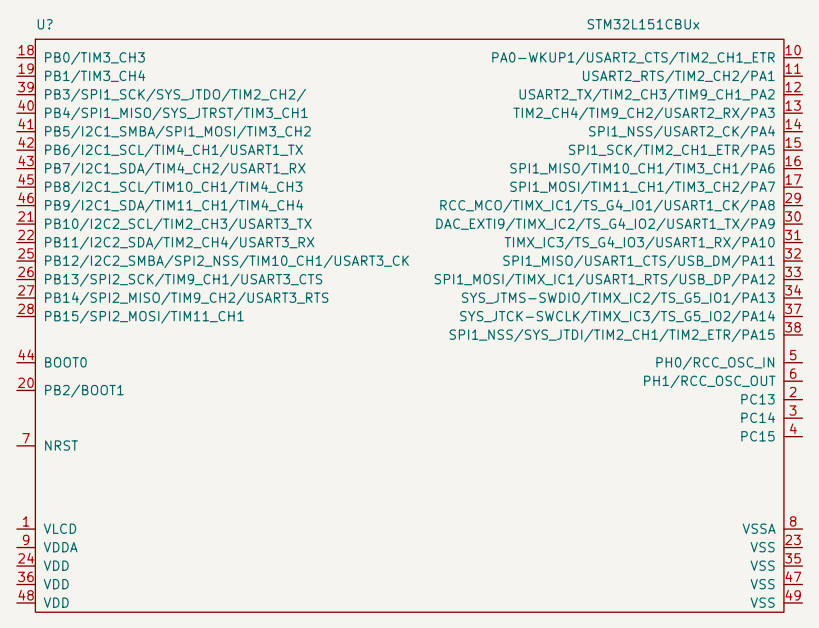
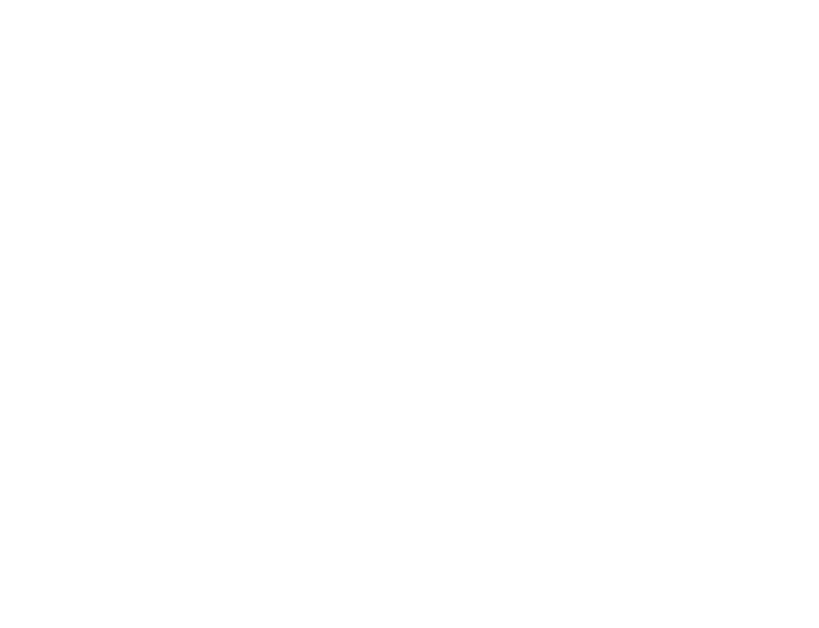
U?: STM32L151CBUx (409, 325) -> none

